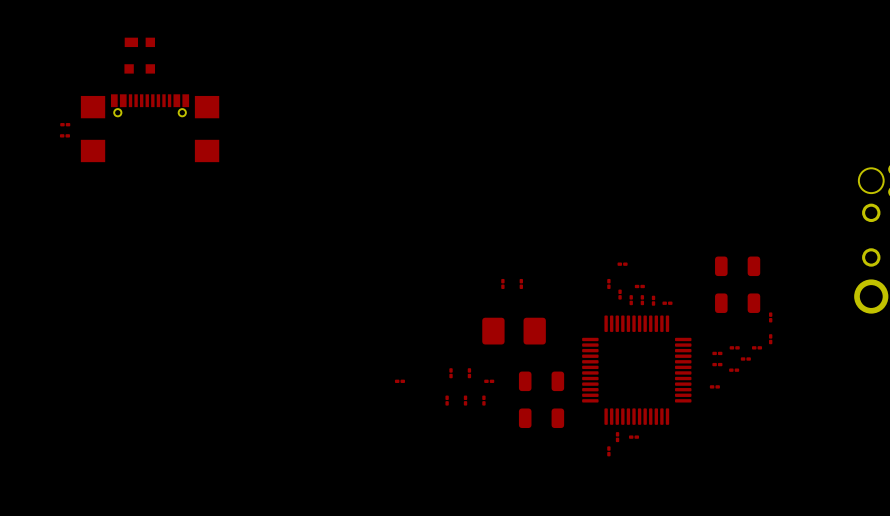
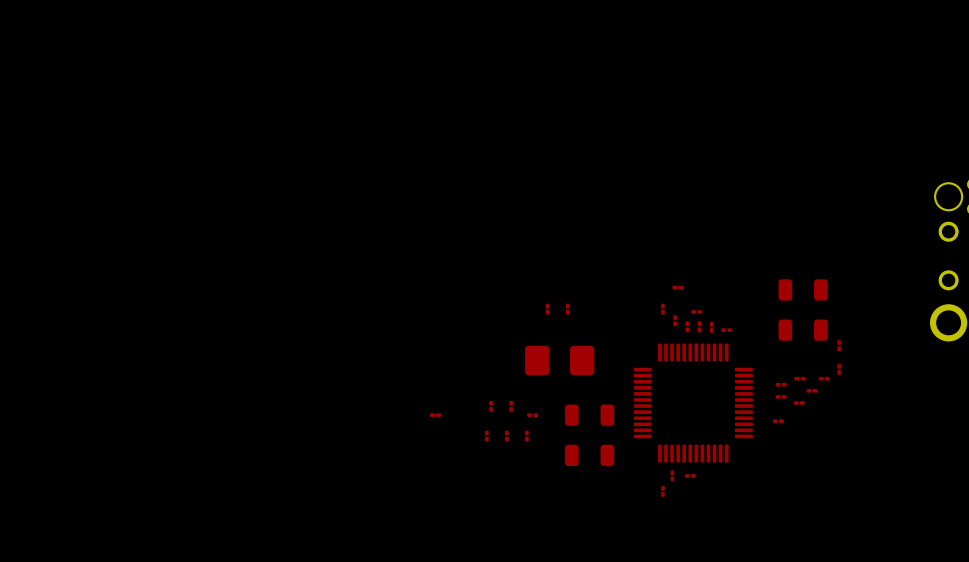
part: (139, 55) -> none
part: (65, 124) -> none
part: (150, 128) -> none
part: (64, 135) -> none

